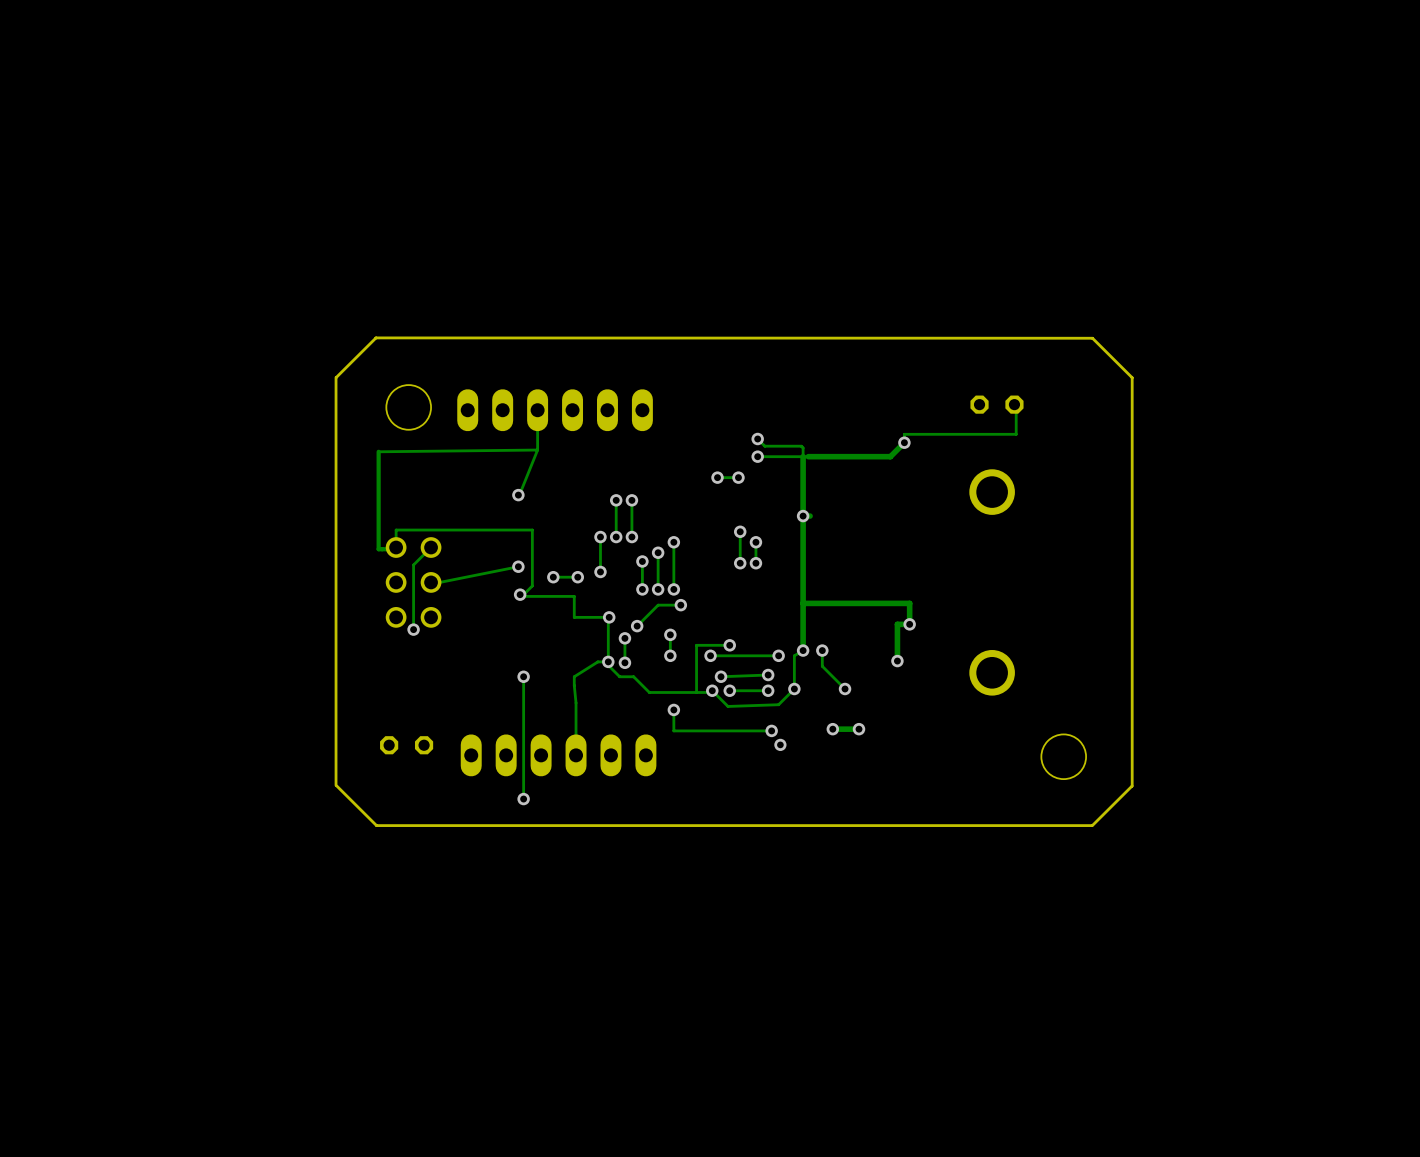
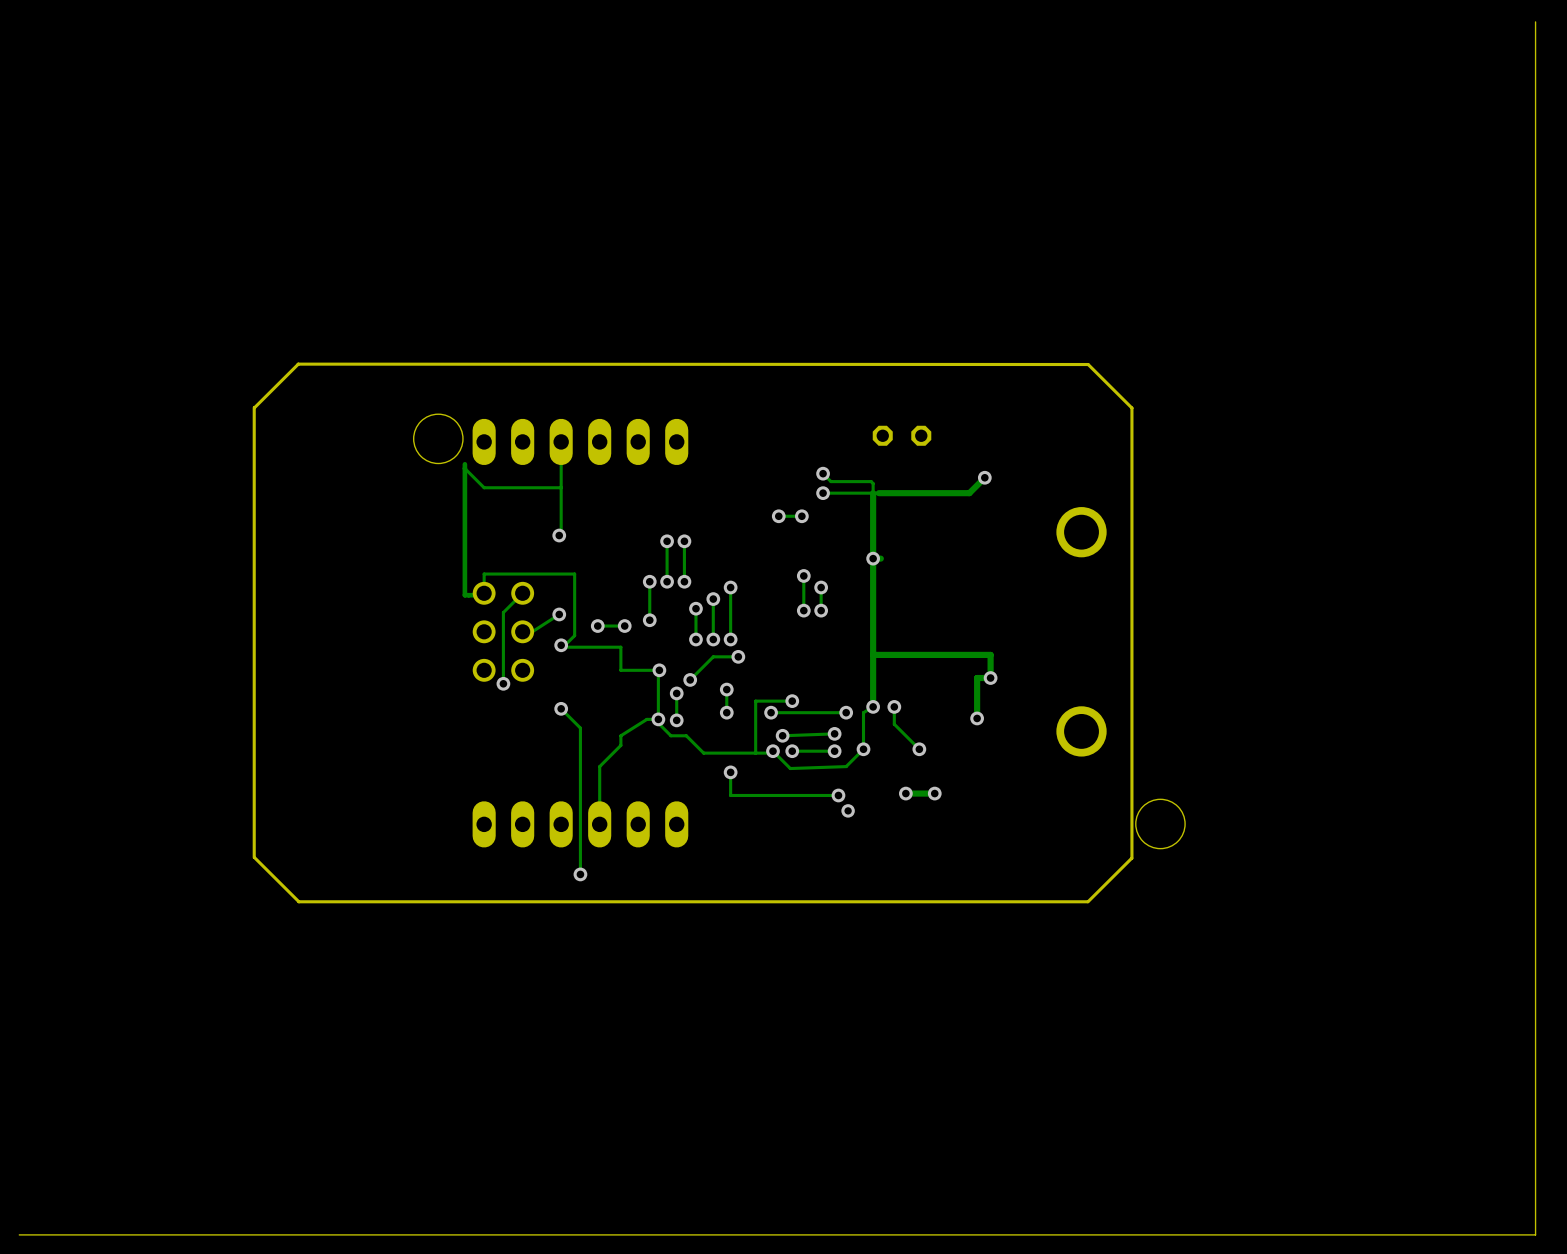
board edge: none -> (1535, 21) (1535, 1234) (19, 1234)
board edge: (375, 337) (1092, 338) -> (298, 364) (1088, 364)
board edge: (376, 337) (336, 377) -> (298, 364) (254, 407)
board edge: (1092, 338) (1132, 377) (1132, 786) -> (1088, 364) (1131, 408) (1131, 858)
board edge: (336, 377) (336, 785) -> (254, 407) (254, 857)
part position: (996, 404) -> (902, 435)
track: (1014, 404) (1016, 404) (1016, 434) (904, 434) (904, 442) -> none
track: (537, 410) (537, 450) -> none
part position: (555, 410) -> (580, 441)
track: none -> (464, 468) (484, 487) (561, 487)
track: (537, 450) (520, 493) -> (561, 441) (561, 533)
track: (537, 450) (378, 451) (378, 549) (396, 549) (396, 530) (450, 530) -> (464, 464) (464, 595) (484, 595) (484, 574)
track: (431, 547) (413, 564) (413, 629) -> (522, 593) (503, 612) (503, 683)
track: (518, 566) (439, 582) (431, 582) -> (559, 614) (532, 631) (522, 631)
part position: (413, 582) -> (503, 631)
via: (413, 629) -> none
via: none -> (503, 683)
track: none -> (561, 708) (580, 728) (580, 874)
track: (523, 675) (523, 799) -> none
via position: (523, 676) -> (561, 708)
track: (574, 685) (576, 755) -> (620, 745) (599, 766) (599, 824)
part: (406, 745) -> none
part position: (558, 755) -> (580, 824)
board edge: (336, 786) (376, 825) (1092, 825) -> (255, 858) (298, 901) (1087, 901)
board edge: (1132, 786) (1092, 825) -> (1131, 858) (1088, 901)
via position: (523, 799) -> (580, 874)

